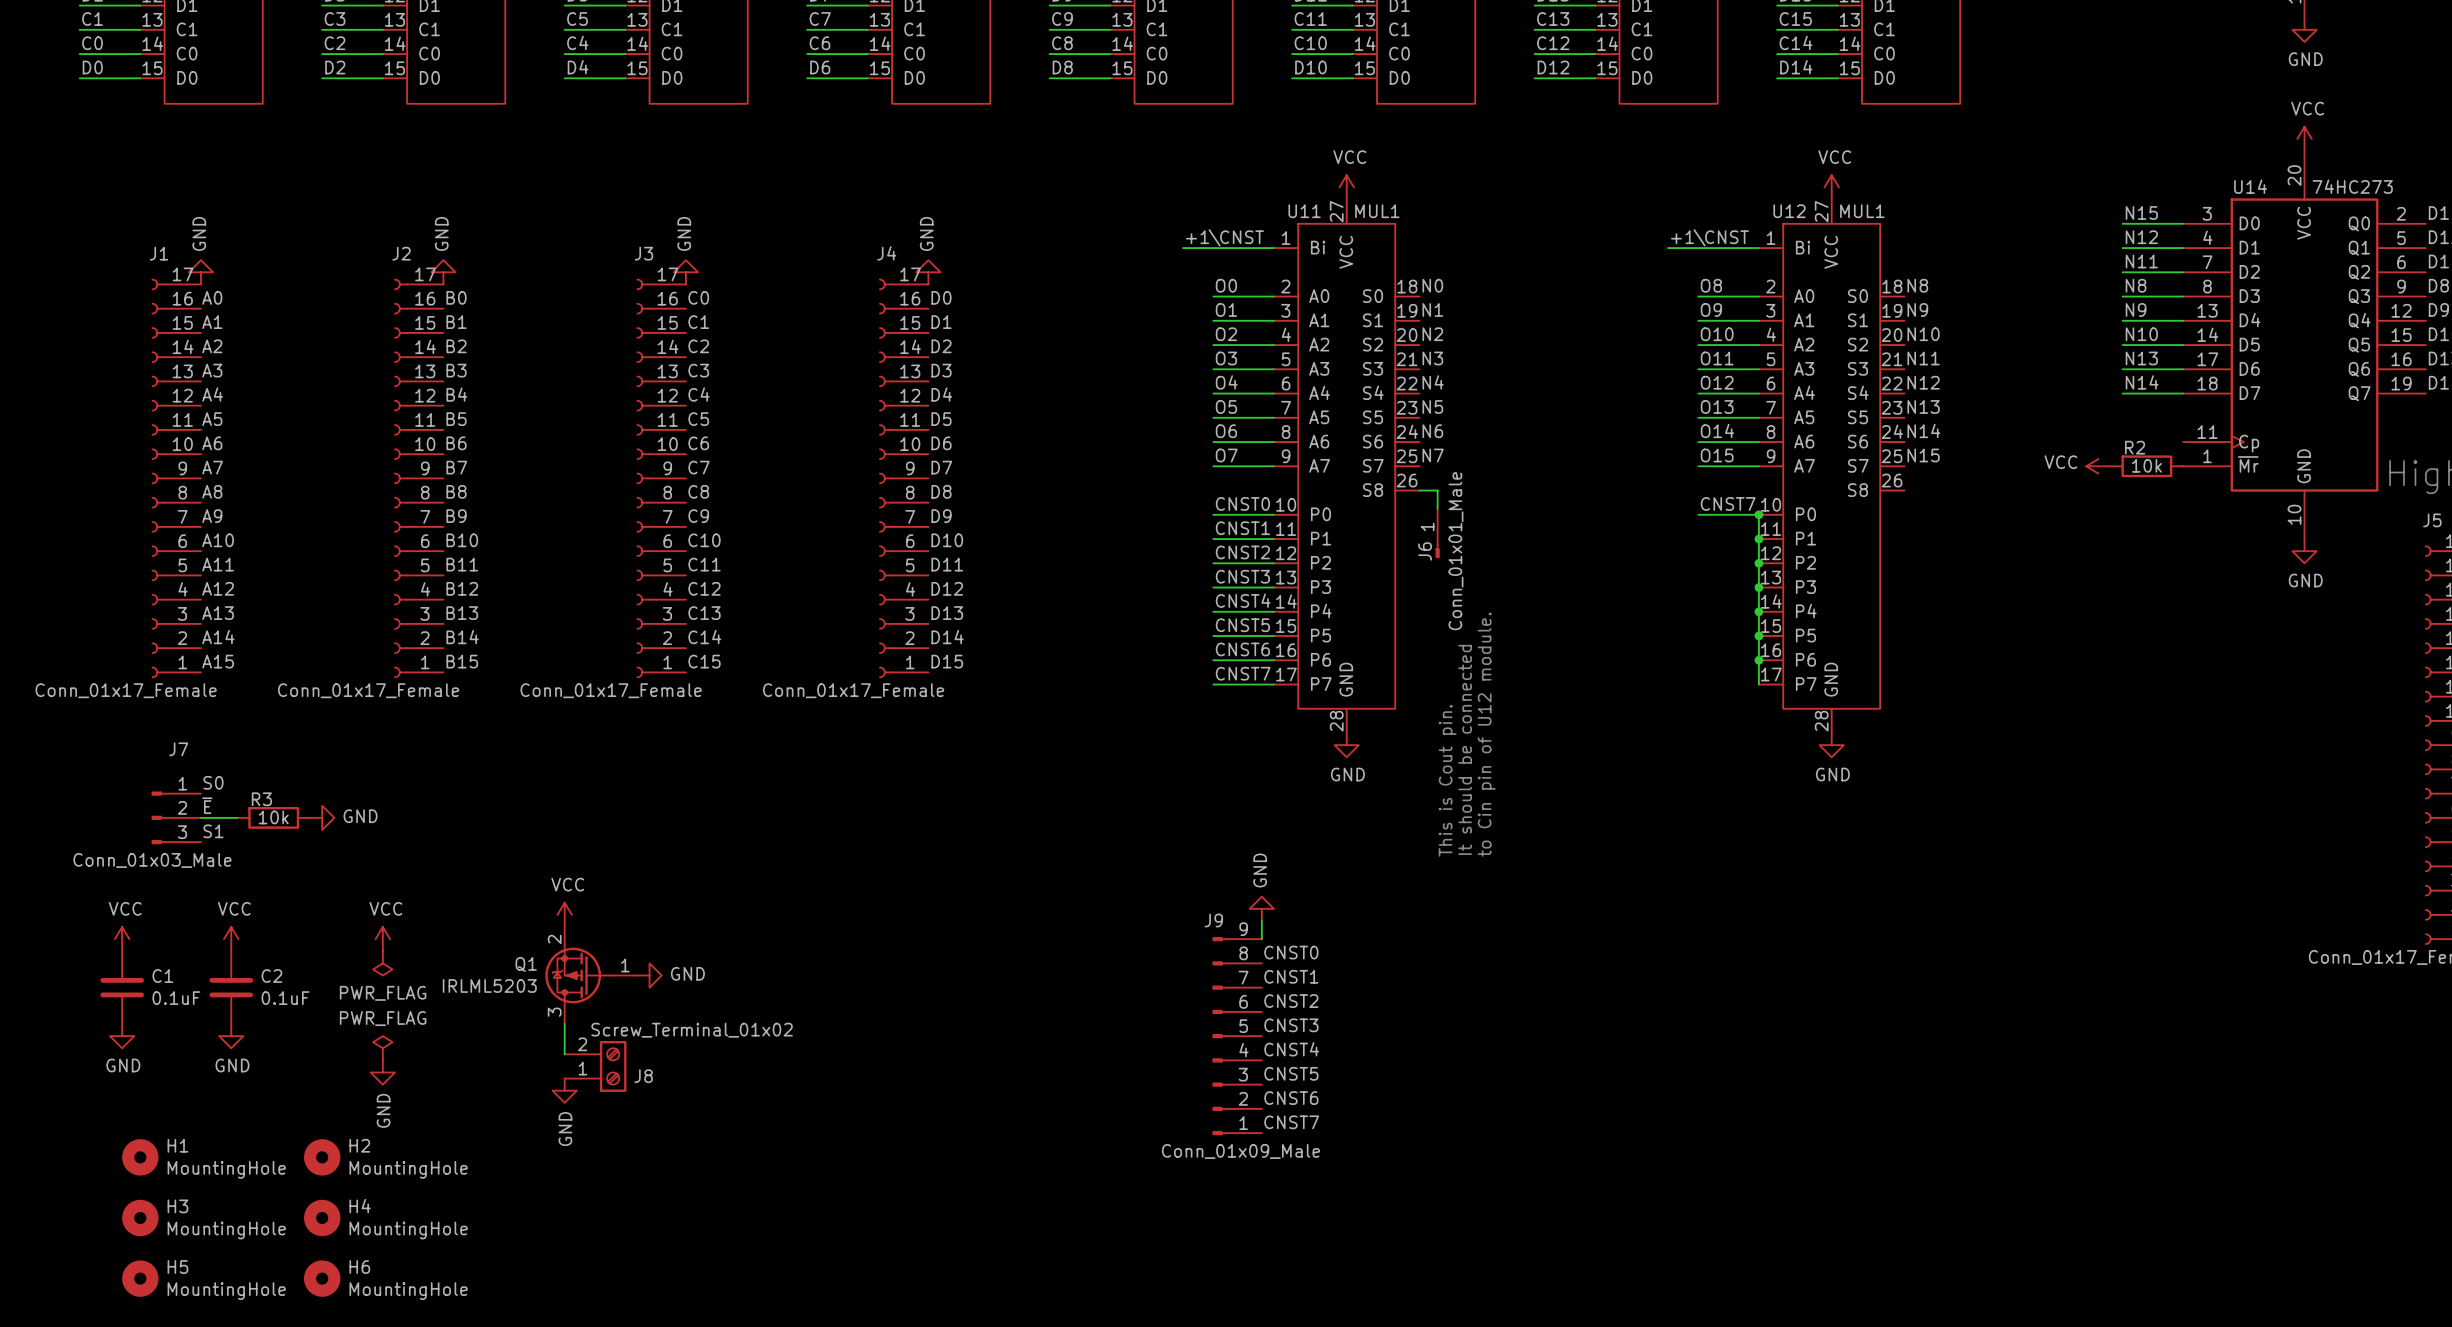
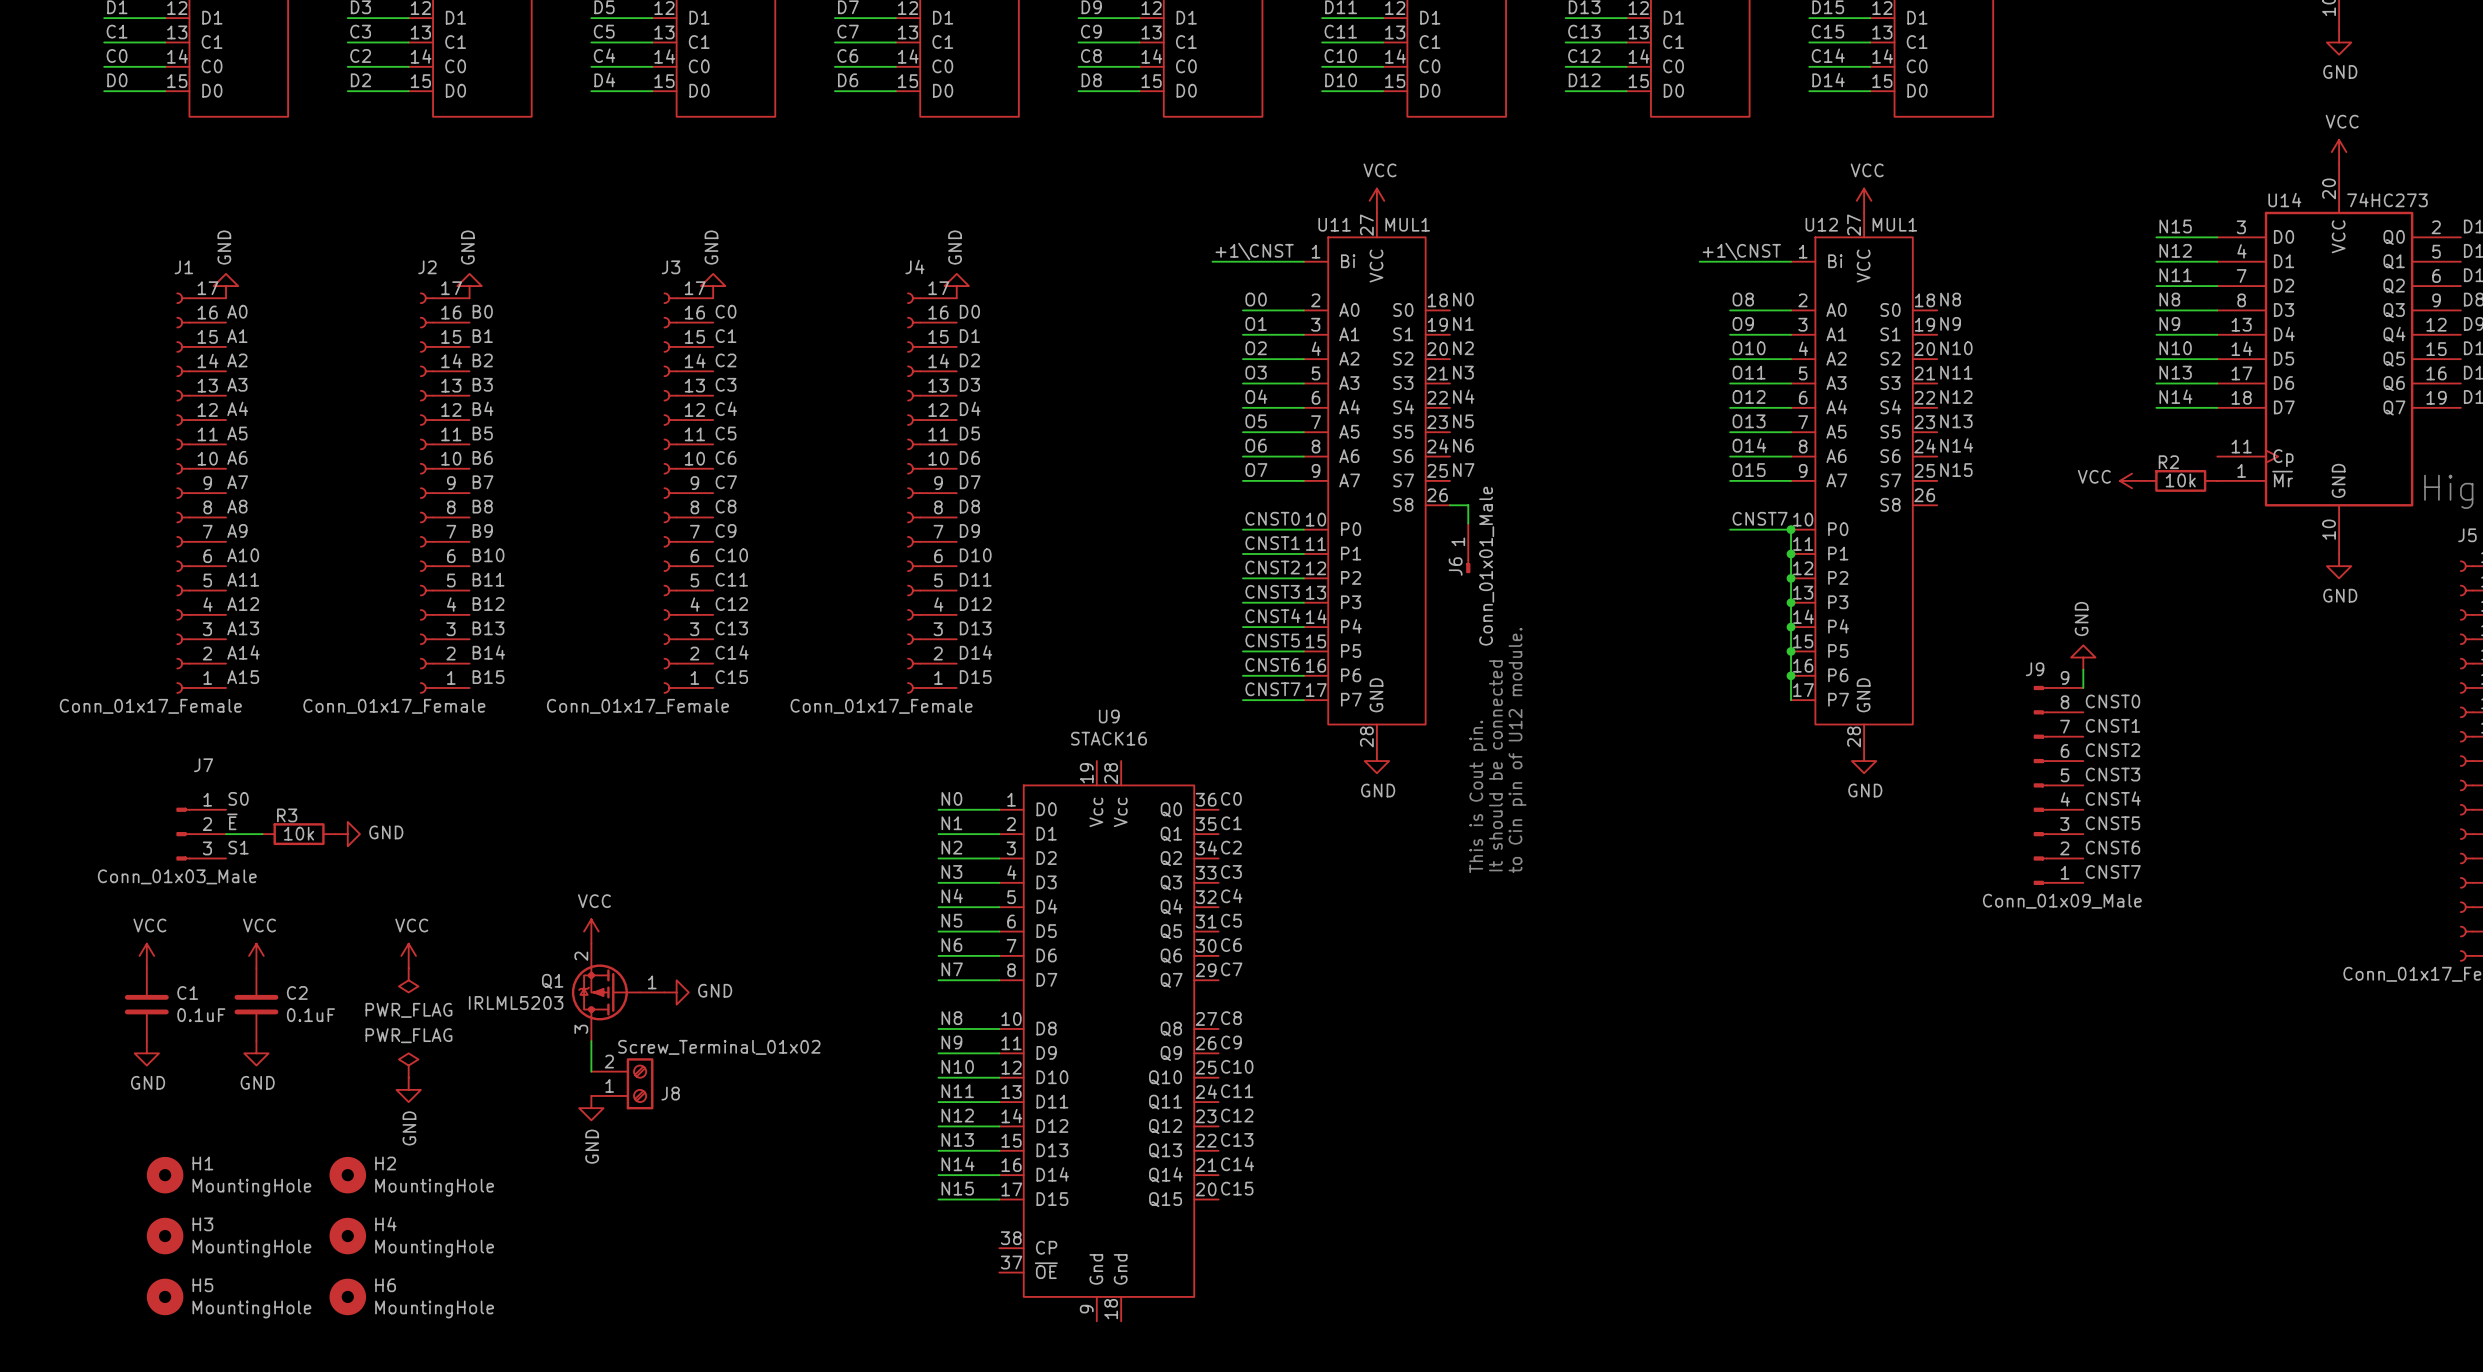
power symbol: none -> GND (2083, 657)
wire: none -> (2083, 669) (2083, 687)
label: none -> CNST0 (2112, 701)
label: none -> CNST1 (2112, 725)
label: none -> CNST2 (2112, 750)
label: none -> CNST3 (2112, 774)
label: none -> N0 (951, 798)
label: none -> C0 (1231, 798)
label: none -> CNST4 (2113, 798)
wire: none -> (938, 809) (999, 809)
label: none -> N1 (951, 823)
label: none -> C1 (1231, 823)
label: none -> CNST5 (2112, 823)
wire: none -> (938, 834) (999, 834)
label: none -> N2 (951, 847)
label: none -> C2 (1231, 847)
label: none -> CNST6 (2112, 847)
wire: none -> (938, 858) (999, 858)
label: none -> N3 (951, 871)
label: none -> C3 (1231, 871)
label: none -> CNST7 (2113, 871)
wire: none -> (938, 882) (999, 882)
label: none -> N4 (952, 896)
label: none -> C4 (1231, 896)
wire: none -> (938, 907) (999, 907)
label: none -> N5 (951, 920)
label: none -> C5 (1231, 920)
power symbol: GND (1261, 908) -> none
wire: none -> (938, 931) (999, 931)
wire: (1261, 920) (1261, 939) -> none
label: none -> N6 (951, 945)
label: none -> C6 (1231, 945)
wire: none -> (938, 955) (999, 955)
label: none -> N7 (952, 969)
label: none -> C7 (1231, 969)
label: CNST0 (1291, 952) -> none
wire: none -> (938, 980) (999, 980)
label: CNST1 (1291, 976) -> none
label: none -> N8 (951, 1018)
label: none -> C8 (1231, 1018)
label: CNST2 (1291, 1001) -> none
wire: none -> (938, 1028) (999, 1028)
U9: none -> STACK16 (1108, 1041)
label: none -> N9 (951, 1042)
label: none -> C9 (1231, 1042)
label: CNST3 (1291, 1025) -> none
wire: none -> (938, 1053) (999, 1053)
J9 position: (1237, 1036) -> (2058, 785)
label: none -> N10 (957, 1066)
label: none -> C10 (1237, 1066)
label: CNST4 (1291, 1049) -> none
wire: none -> (938, 1077) (999, 1077)
label: none -> N11 (957, 1091)
label: none -> C11 (1237, 1091)
label: CNST5 (1291, 1073) -> none
wire: none -> (938, 1102) (999, 1102)
label: none -> N12 (957, 1115)
label: none -> C12 (1237, 1115)
label: CNST6 (1291, 1098) -> none
wire: none -> (938, 1126) (999, 1126)
label: none -> N13 (957, 1139)
label: none -> C13 (1237, 1139)
label: CNST7 (1291, 1122) -> none
wire: none -> (938, 1150) (999, 1150)
label: none -> N14 (957, 1163)
label: none -> C14 (1237, 1163)
wire: none -> (938, 1175) (999, 1175)
label: none -> N15 (957, 1188)
label: none -> C15 (1237, 1188)
wire: none -> (938, 1199) (999, 1199)

